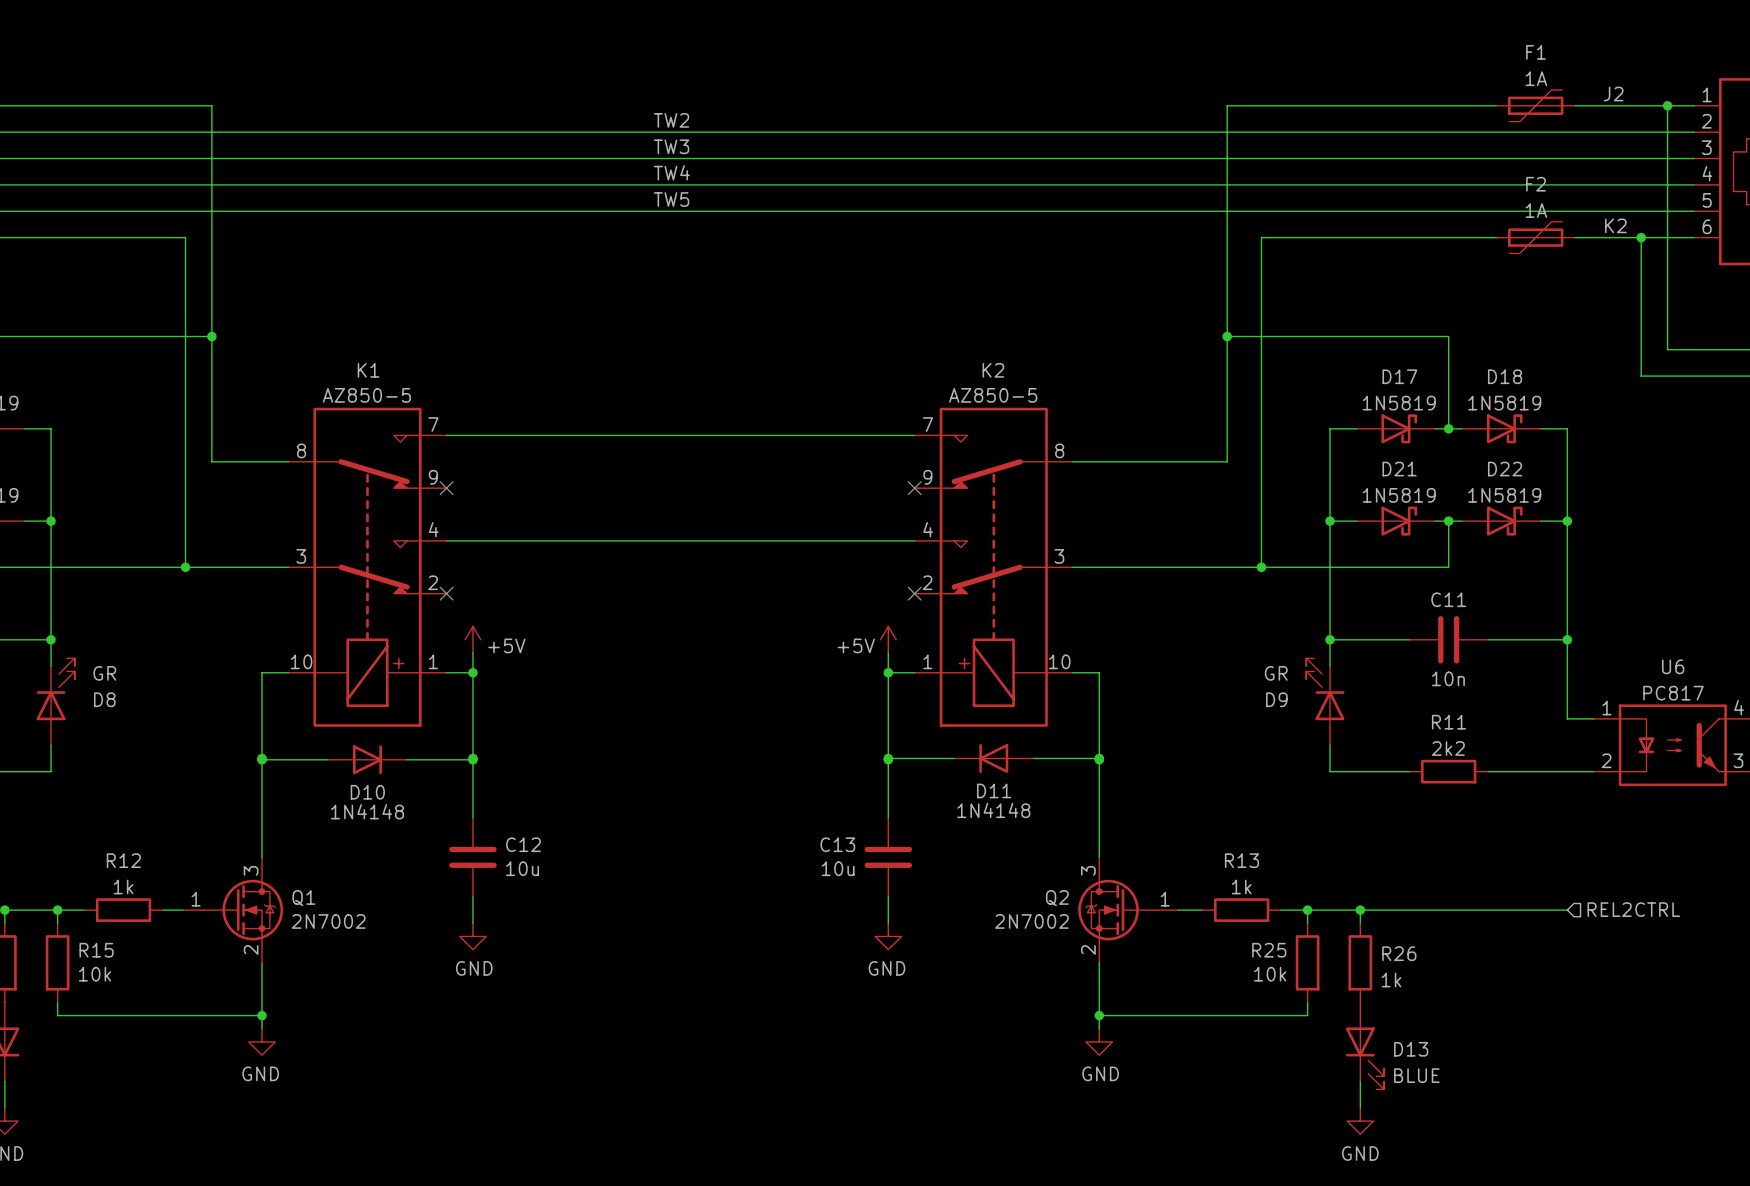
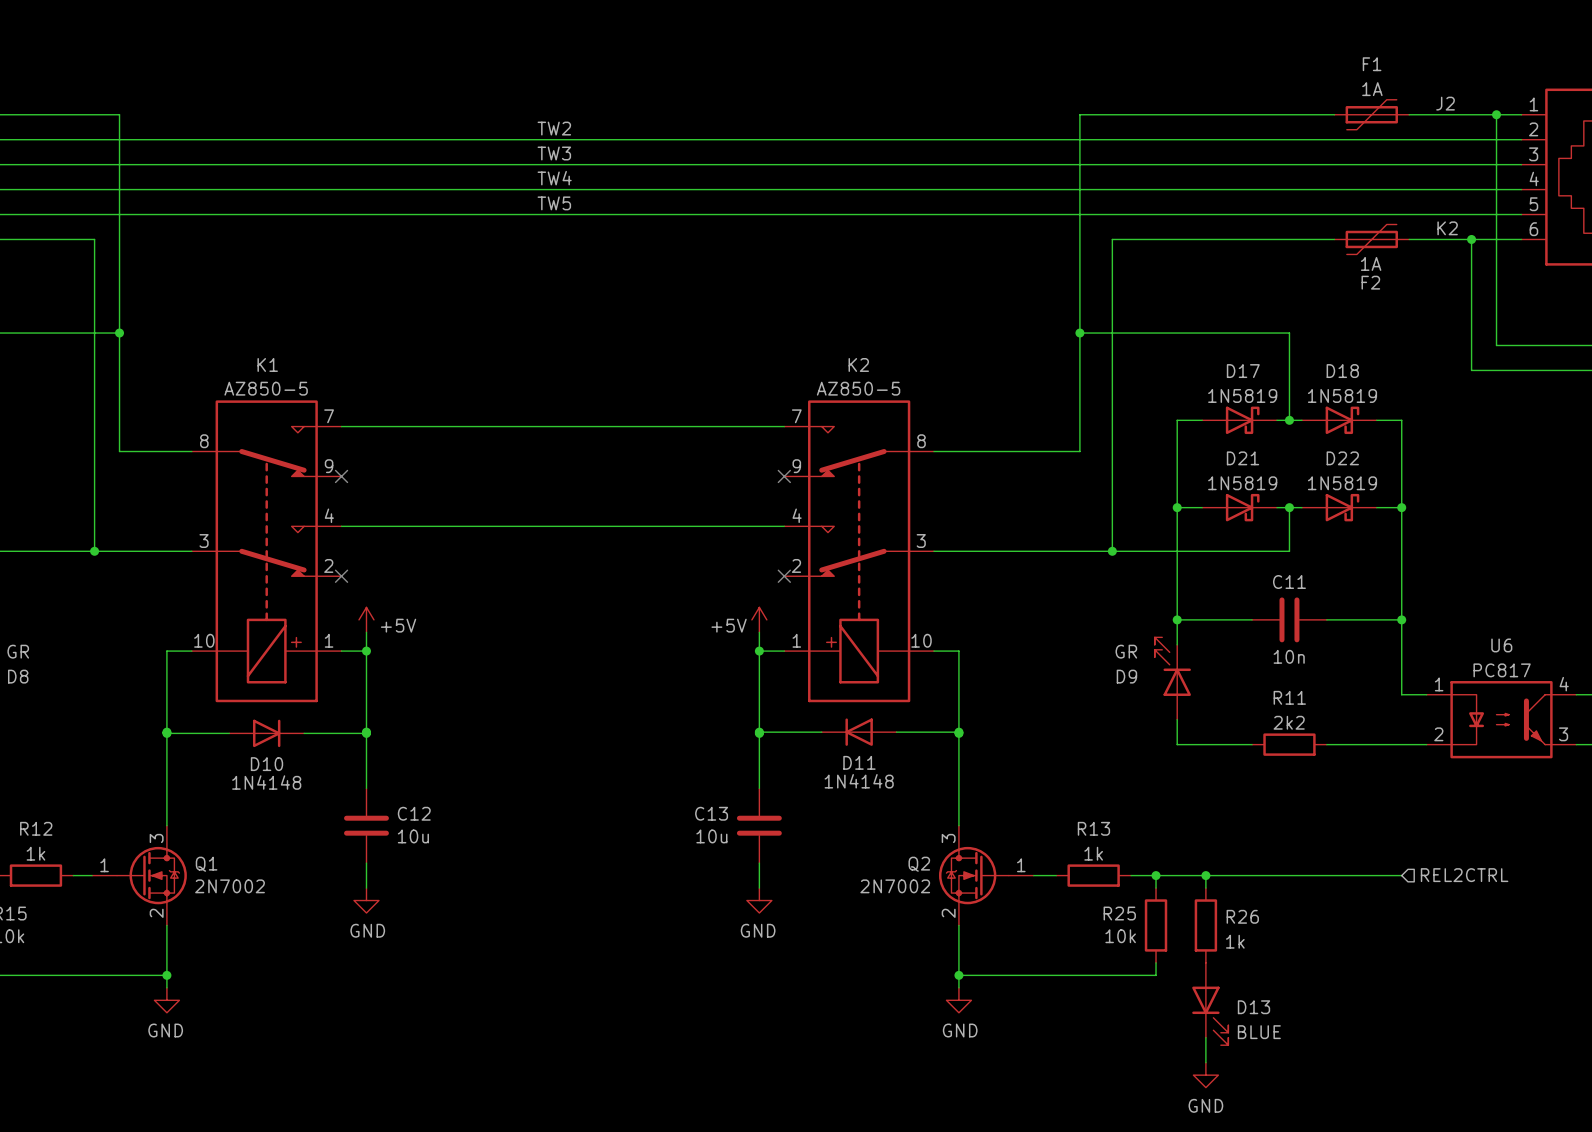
F2 name position: F2 (1536, 184) -> F2 (1370, 282)
F2 value position: 1A (1536, 210) -> 1A (1371, 263)

